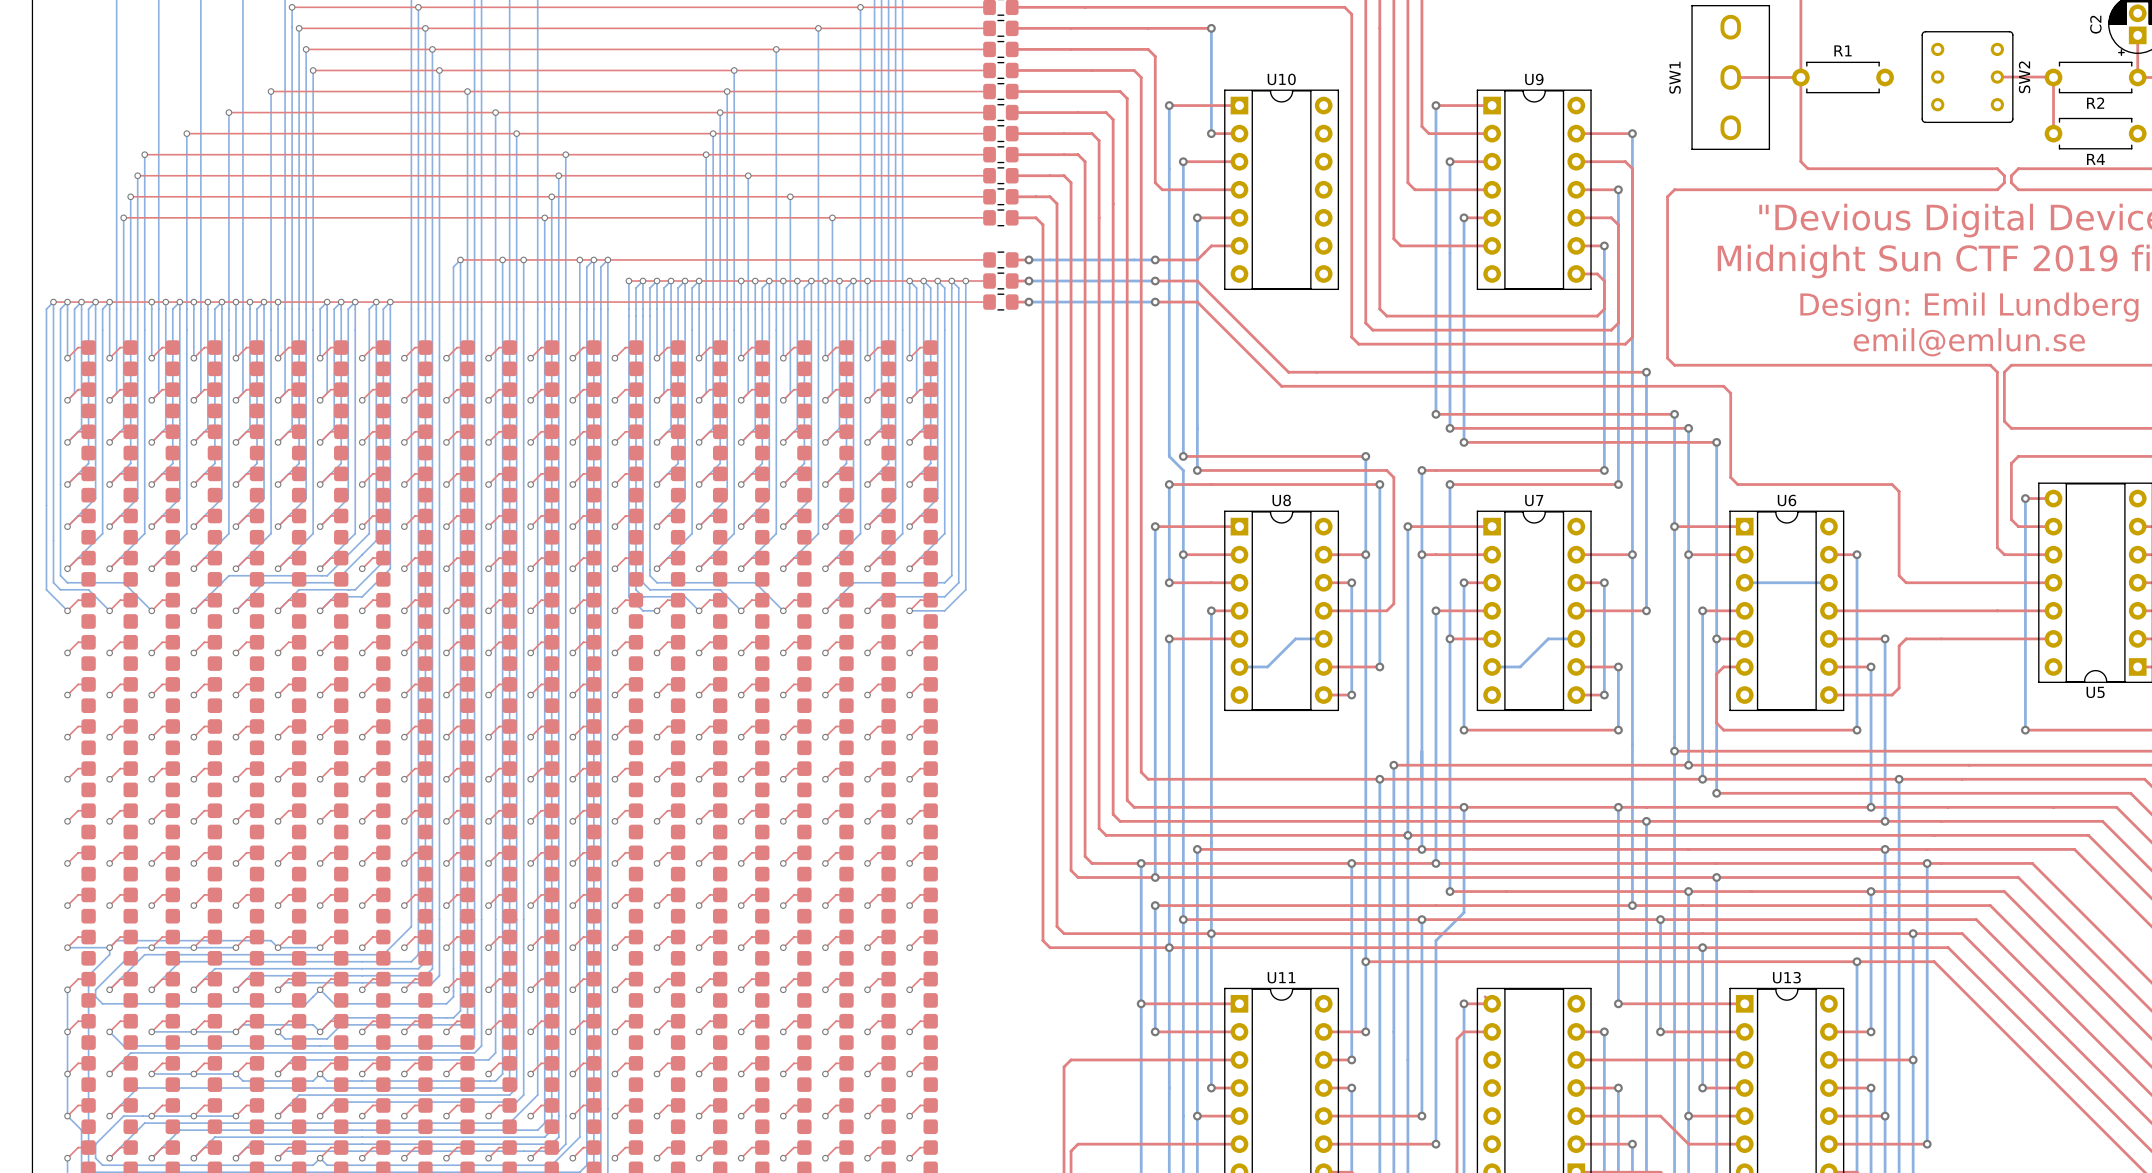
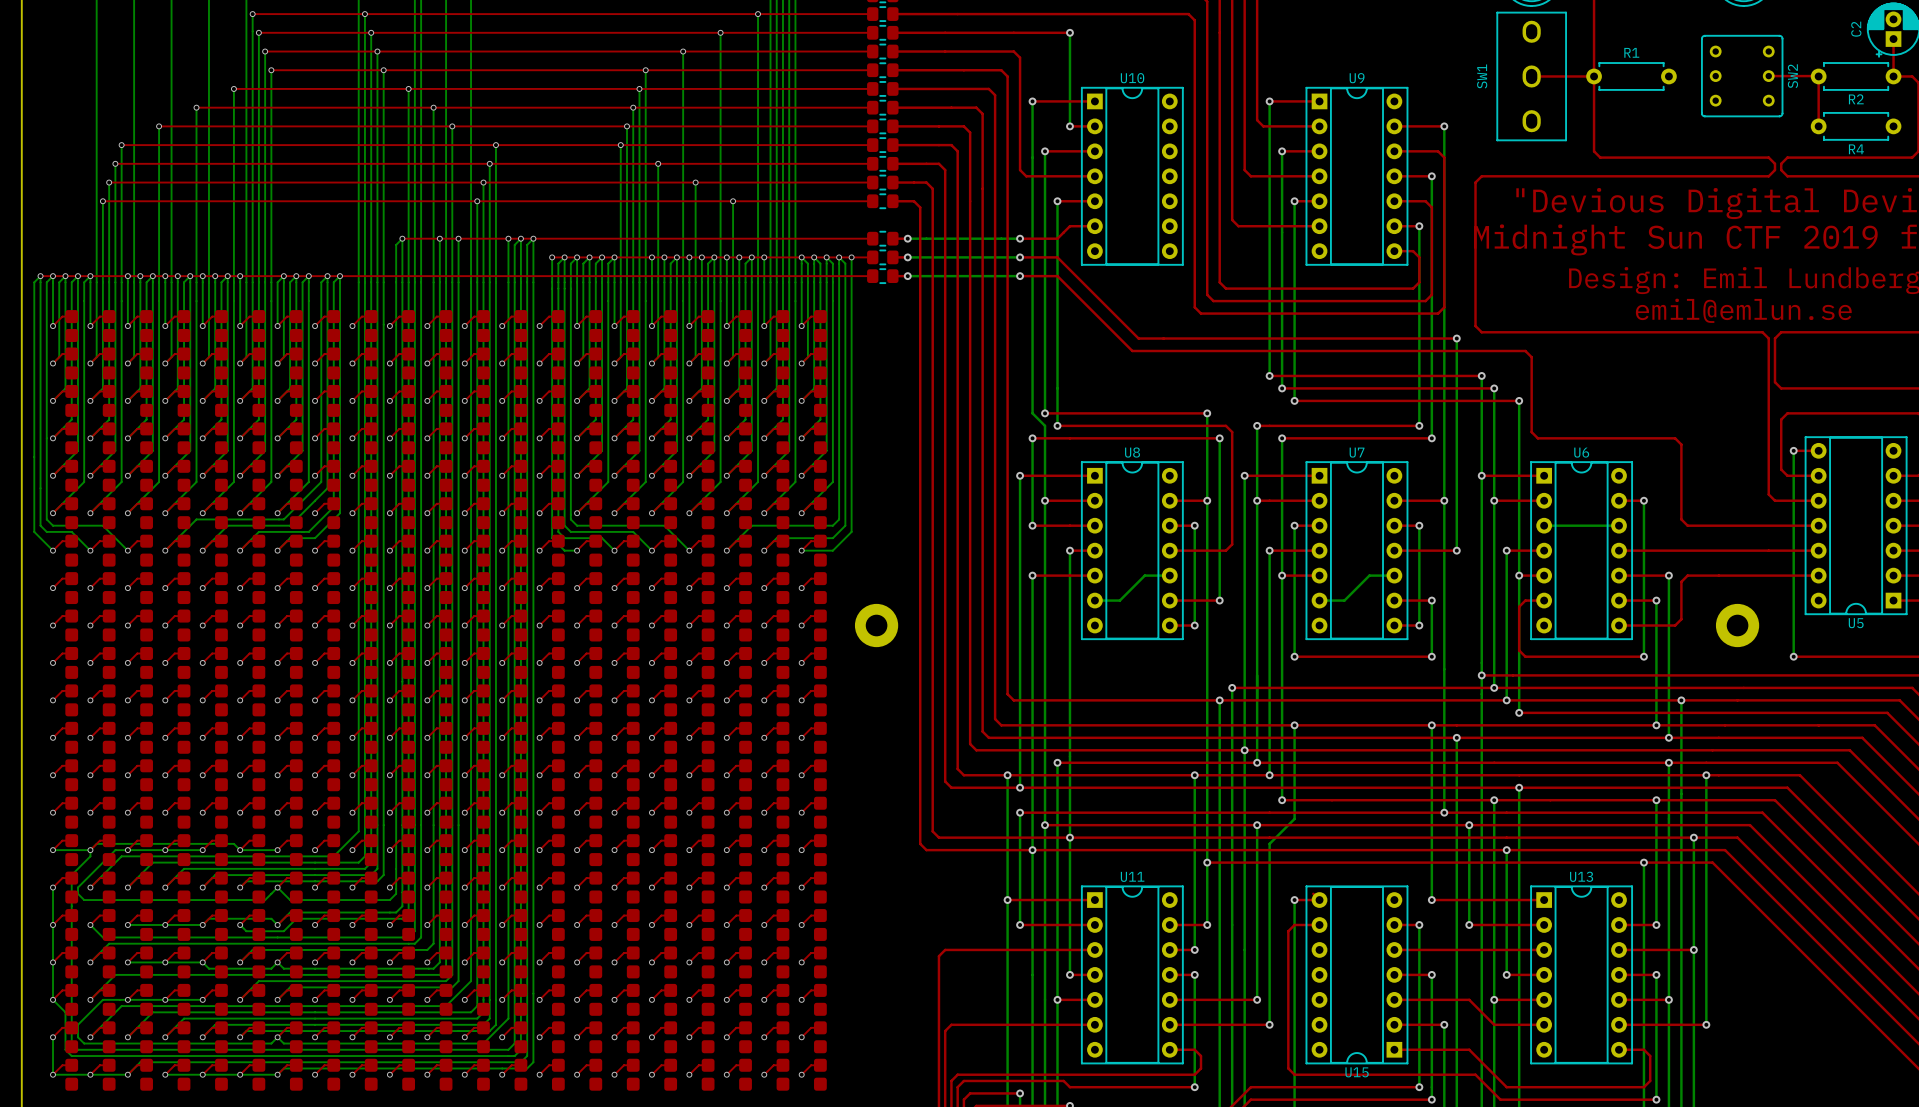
part: none -> (876, 625)
part: none -> (1737, 625)

